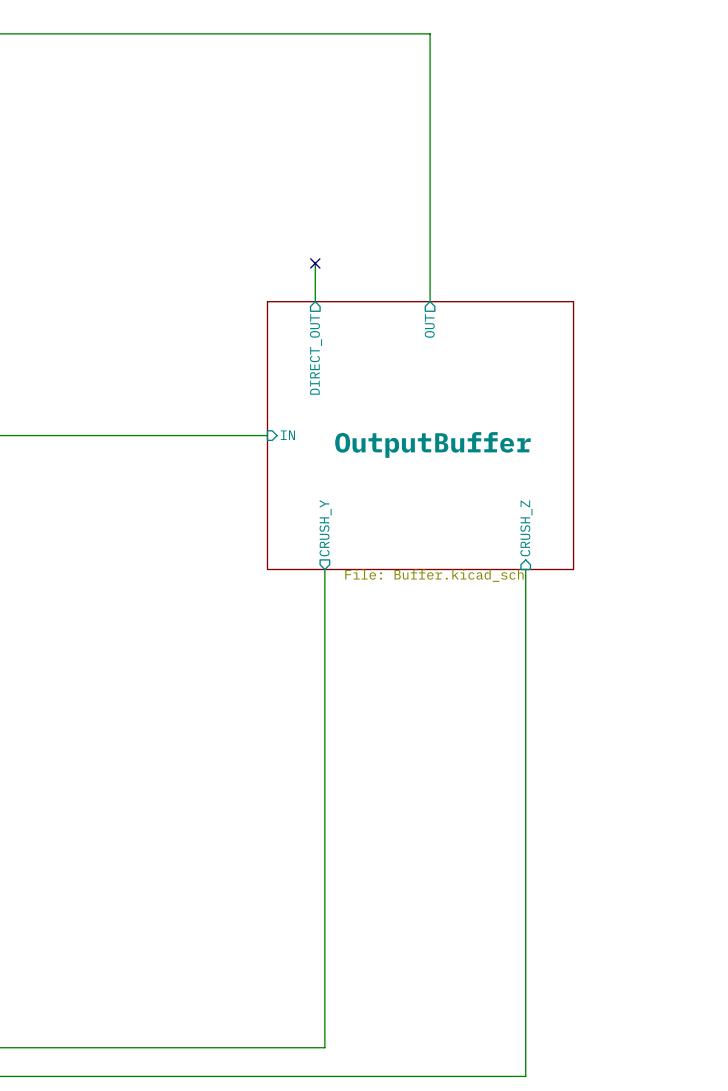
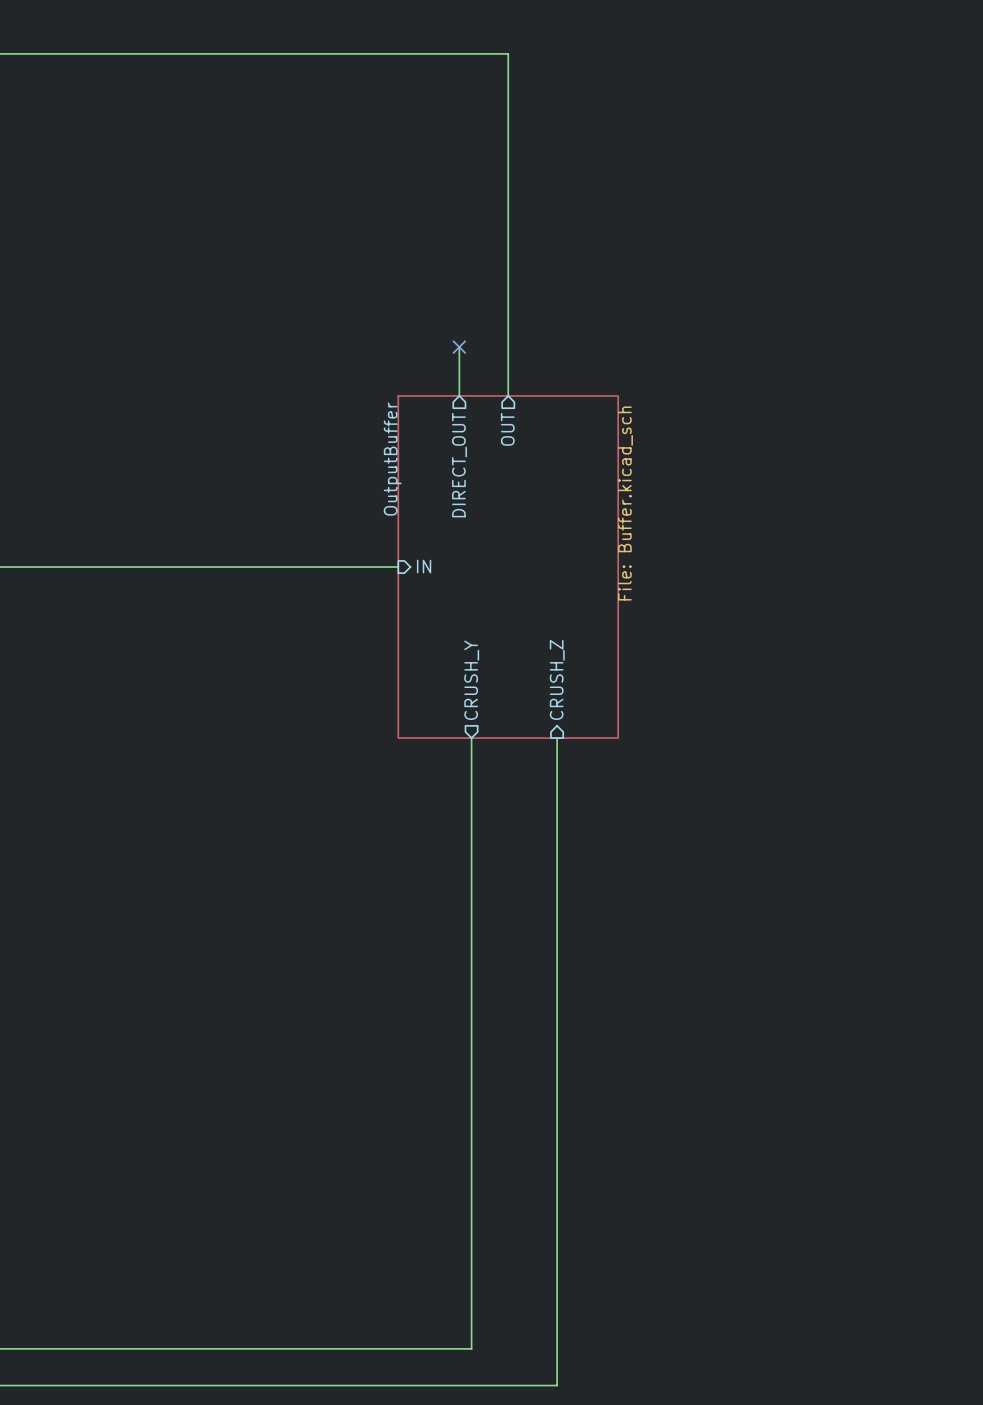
wire: (353, 33) (430, 33) (430, 301) -> (508, 53) (508, 395)
sheet pin position: OUT (429, 325) -> OUT (507, 429)
sheet OutputBuffer: none -> File: Buffer.kicad_sch (508, 567)
sheet OutputBuffer: File: Buffer.kicad_sch (420, 435) -> none
sheet pin position: CRUSH_Z (526, 528) -> CRUSH_Z (557, 679)
wire: (525, 569) (525, 1076) (391, 1076) -> (557, 738) (557, 1385)

